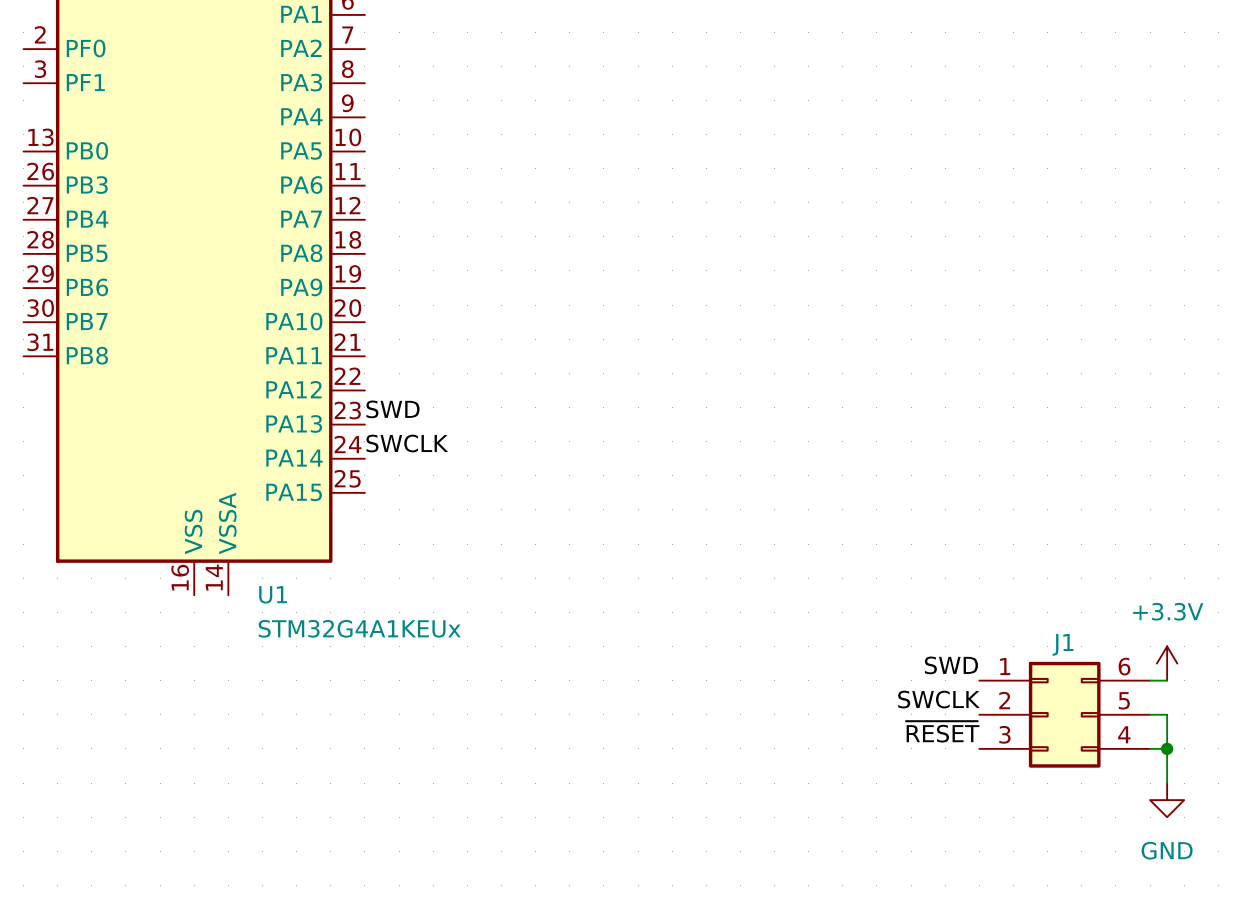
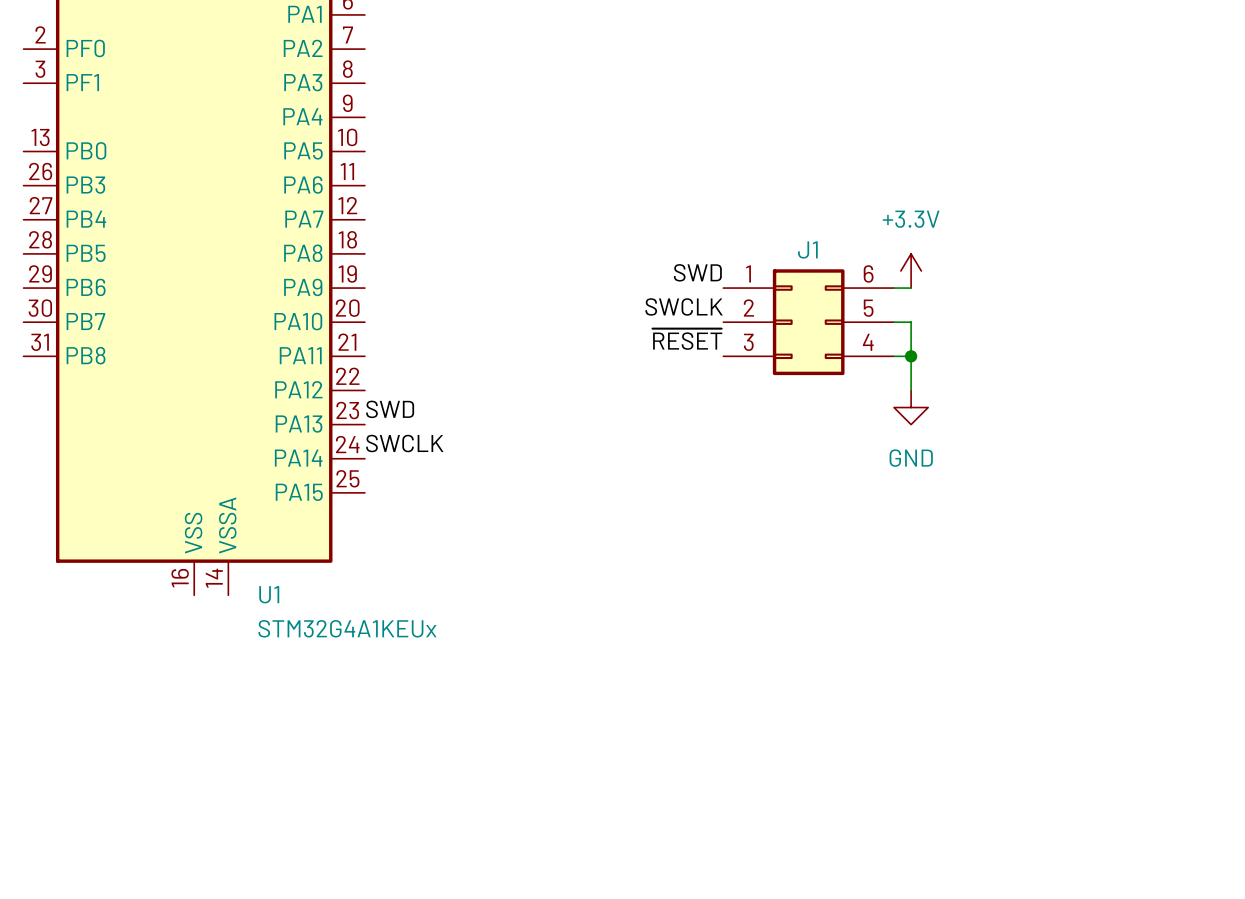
power symbol: none -> +3.3V (911, 270)
label: none -> SWD (697, 272)
wire: none -> (894, 288) (911, 288)
label: none -> SWCLK (684, 306)
wire: none -> (894, 322) (911, 322) (911, 390)
label: none -> ~{RESET} (687, 339)
wire: none -> (894, 356) (911, 356)
junction: none -> (911, 356)
power symbol: none -> GND (911, 407)
power symbol: +3.3V (1167, 663) -> none
label: SWD (951, 665) -> none
wire: (1150, 680) (1167, 680) -> none
label: SWCLK (939, 699) -> none
J1 position: (1064, 714) -> (808, 322)
wire: (1150, 714) (1167, 714) (1167, 783) -> none
label: ~{RESET} (942, 731) -> none
wire: (1150, 748) (1167, 748) -> none
junction: (1167, 748) -> none
power symbol: GND (1167, 800) -> none

